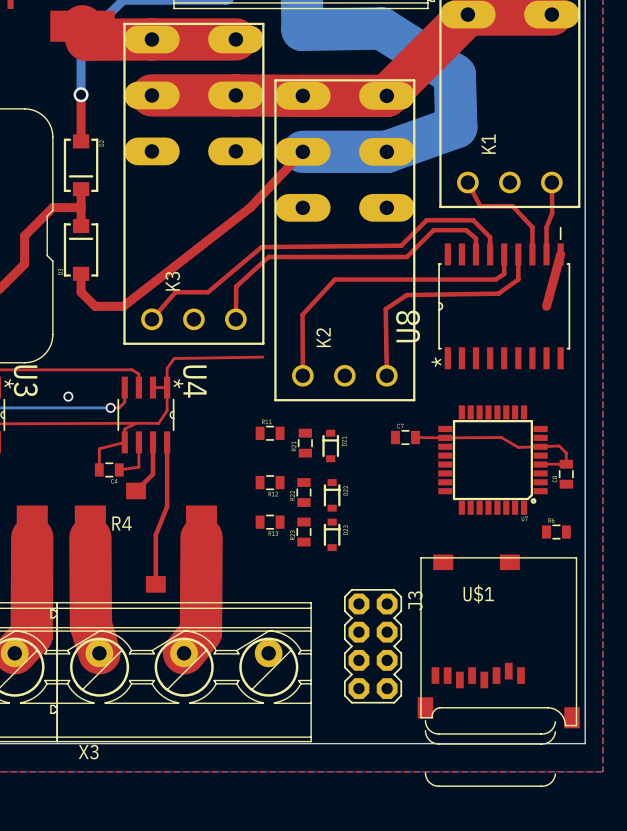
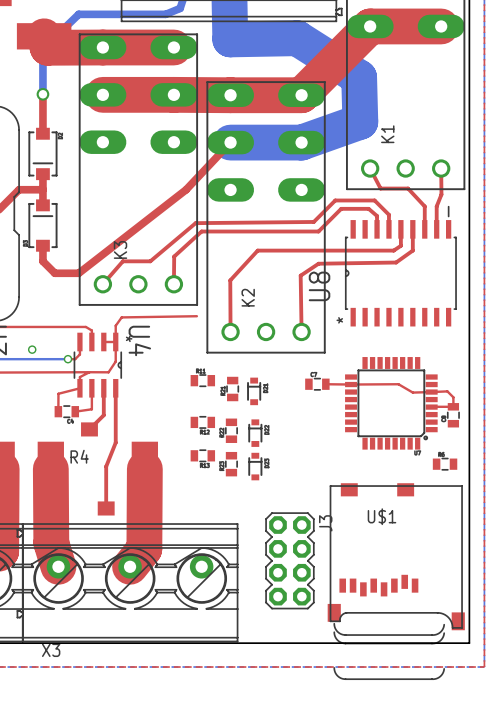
top track: (560, 254) (546, 306) -> none

